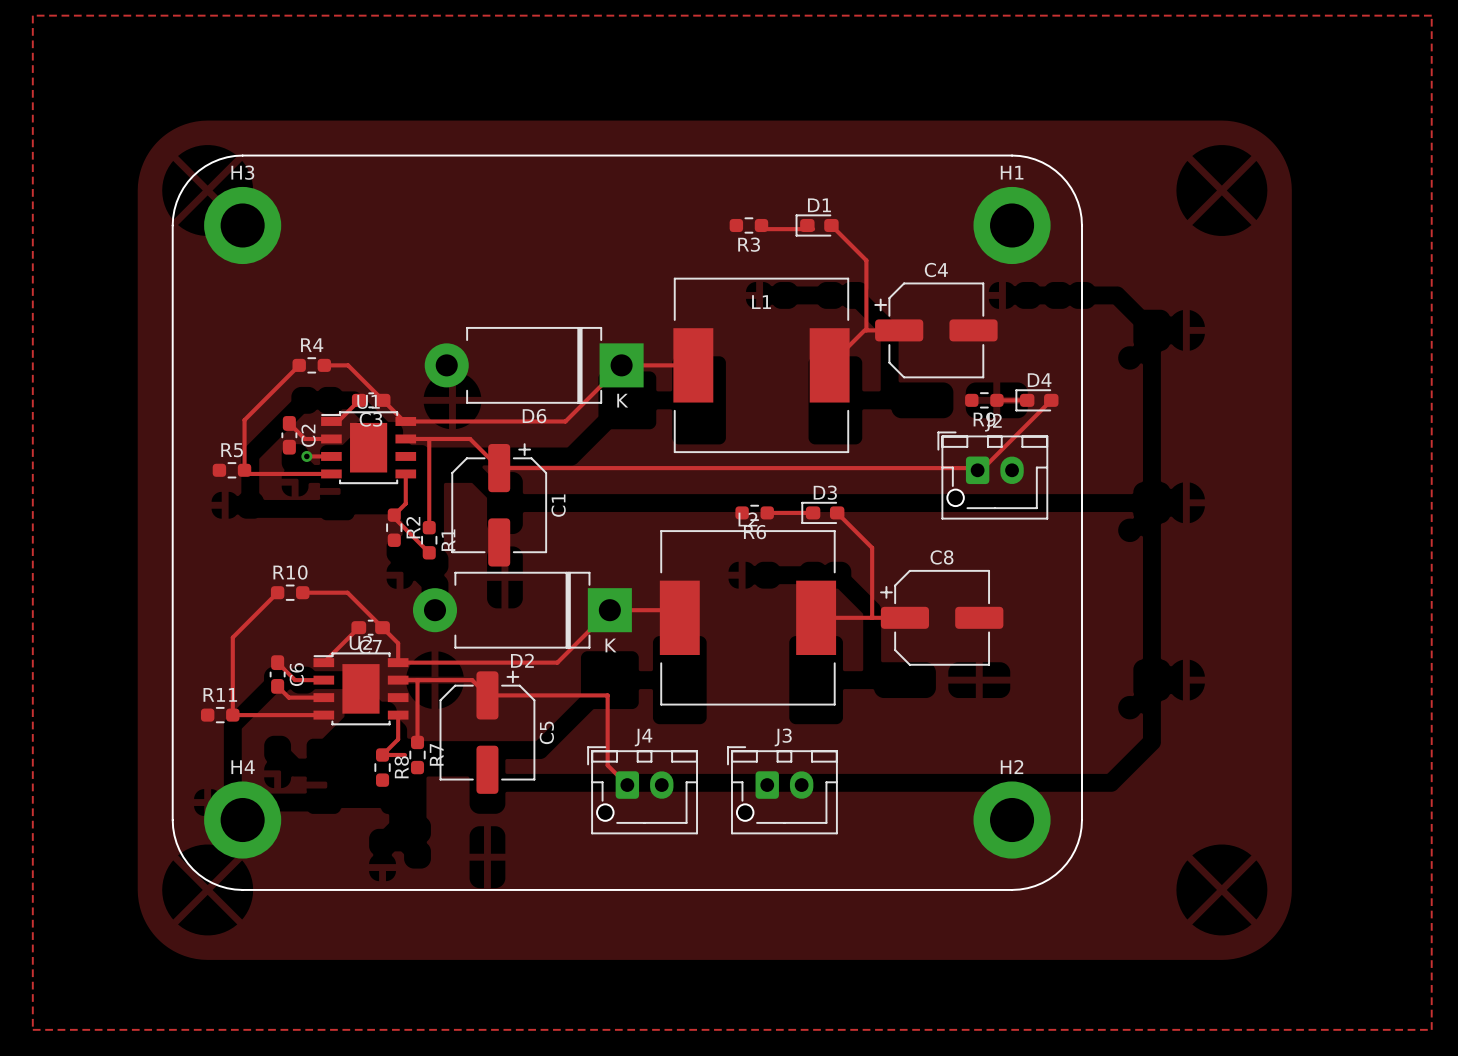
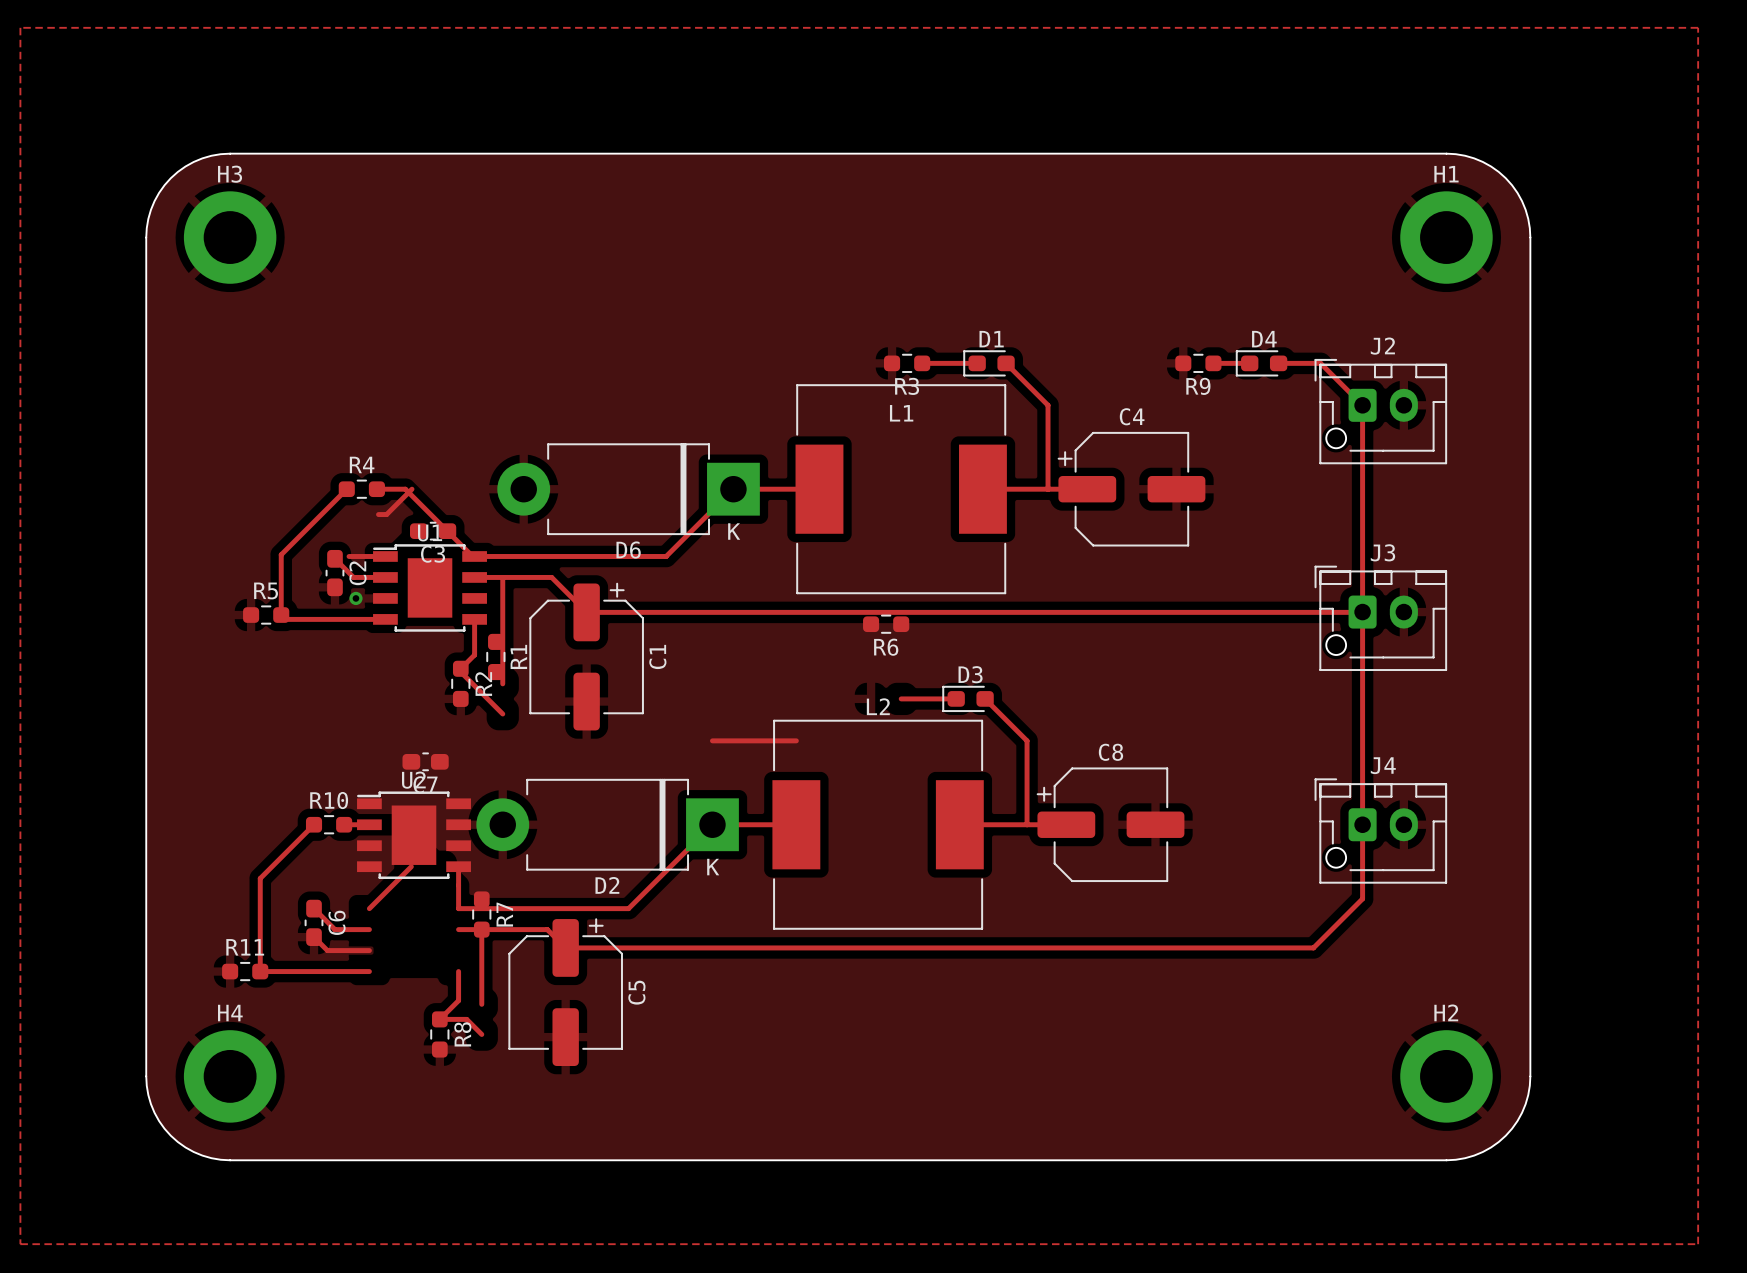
board edge: (242, 155) (1012, 155) (1035, 159) (1055, 170) (1066, 181) (1075, 195) (1080, 209) (1081, 225) (1081, 820) (1078, 843) (1066, 863) (1055, 874) (1042, 883) (1027, 888) (1012, 889) (242, 889) (219, 886) (199, 874) (187, 863) (179, 850) (174, 835) (172, 820) (173, 217) (179, 195) (193, 176) (212, 162) (227, 157) (242, 155) -> (230, 153) (202, 158) (185, 166) (170, 178) (159, 192) (150, 209) (146, 237) (146, 1076) (148, 1095) (154, 1112) (164, 1128) (177, 1141) (202, 1155) (230, 1160) (1446, 1160) (1465, 1158) (1482, 1151) (1498, 1141) (1512, 1128) (1525, 1104) (1530, 1076) (1530, 237) (1528, 218) (1522, 201) (1512, 185) (1498, 171) (1474, 158) (1446, 153) (230, 153)
H3 position: (242, 225) -> (230, 237)
R3 position: (748, 225) -> (907, 363)
D1 position: (817, 225) -> (988, 363)
track: (831, 225) (866, 260) (866, 330) (899, 330) -> none
H1 position: (1012, 225) -> (1446, 237)
track: (767, 229) (813, 229) -> (922, 363) (977, 363)
track: none -> (1006, 363) (1048, 405) (1048, 489)
track: none -> (1278, 363) (1320, 363) (1362, 405) (1362, 898) (1313, 947) (565, 947) (547, 929) (458, 929)
track: (864, 330) (829, 365) -> none
C4 position: (936, 330) -> (1131, 489)
track: (299, 365) (244, 420) (244, 470) (248, 473) (310, 473) -> (334, 558) (353, 577)
R4 position: (311, 365) -> (361, 489)
track: (324, 365) (348, 365) (404, 421) (565, 421) (621, 365) (693, 365) -> (376, 489) (405, 489) (472, 556) (666, 556) (733, 489) (819, 489)
D6 position: (534, 365) -> (628, 489)
L1 position: (761, 365) -> (901, 489)
track: none -> (346, 489) (281, 554) (281, 615) (285, 619) (385, 619)
C3 position: (371, 400) -> (433, 531)
track: none -> (982, 489) (1087, 489)
R9 position: (984, 400) -> (1198, 363)
track: (996, 400) (1027, 400) -> (1213, 363) (1249, 363)
D4 position: (1037, 400) -> (1261, 363)
track: (1051, 400) (981, 470) (975, 468) (499, 468) (470, 438) (405, 438) -> none
track: (289, 423) (304, 438) (331, 438) -> none
C2 position: (289, 435) -> (334, 573)
track: (429, 438) (429, 527) -> (502, 577) (502, 683)
U1 position: (368, 447) -> (430, 587)
via position: (306, 456) -> (355, 598)
R5 position: (231, 470) -> (266, 615)
track: (405, 473) (405, 503) (394, 515) (394, 517) (429, 552) -> (474, 619) (474, 654) (460, 668) (460, 672) (502, 713)
track: none -> (474, 577) (551, 577) (586, 612) (1362, 612)
J2 position: (992, 475) -> (1380, 411)
C1 position: (499, 504) -> (586, 656)
track: (767, 512) (813, 512) -> (901, 698) (956, 698)
D3 position: (822, 512) -> (968, 698)
track: (837, 512) (872, 547) (872, 610) -> (985, 698) (1027, 740)
R2 position: (394, 527) -> (460, 683)
C8 footprint: [880, 570, 1004, 666] -> [1036, 767, 1185, 883]
track: (277, 592) (232, 637) (232, 715) (323, 715) -> (314, 824) (260, 878) (260, 971) (369, 971)
R10 position: (290, 592) -> (329, 824)
track: (302, 592) (347, 592) (398, 643) (398, 662) (557, 662) (609, 610) (609, 592) -> none
D2 position: (522, 610) -> (607, 824)
L2 position: (747, 617) -> (878, 824)
track: (816, 617) (904, 617) -> (959, 824) (1066, 824)
track: none -> (1027, 750) (1027, 824)
track: (358, 627) (323, 662) -> (411, 866) (369, 908)
track: (277, 662) (295, 680) (302, 680) -> none
C6 position: (277, 674) -> (314, 922)
track: (398, 680) (472, 680) (487, 695) (607, 695) (607, 765) (627, 785) -> none
track: (417, 680) (417, 742) -> (481, 929) (481, 1004)
track: (277, 686) (288, 697) (323, 697) -> (314, 937) (327, 950) (369, 950)
R11 position: (220, 715) -> (245, 971)
C5 position: (487, 732) -> (565, 992)
track: (398, 739) (382, 755) (404, 755) -> (458, 895) (458, 908) (628, 908) (712, 824) (796, 824)
track: none -> (314, 908) (334, 929) (369, 929)
R8 position: (382, 767) -> (439, 1034)
J4 position: (642, 790) -> (1380, 831)
J3 position: (782, 790) -> (1380, 618)
track: none -> (458, 971) (458, 1000) (439, 1019) (466, 1019) (481, 1034)
H4 position: (242, 820) -> (230, 1076)
H2 position: (1012, 820) -> (1446, 1076)

